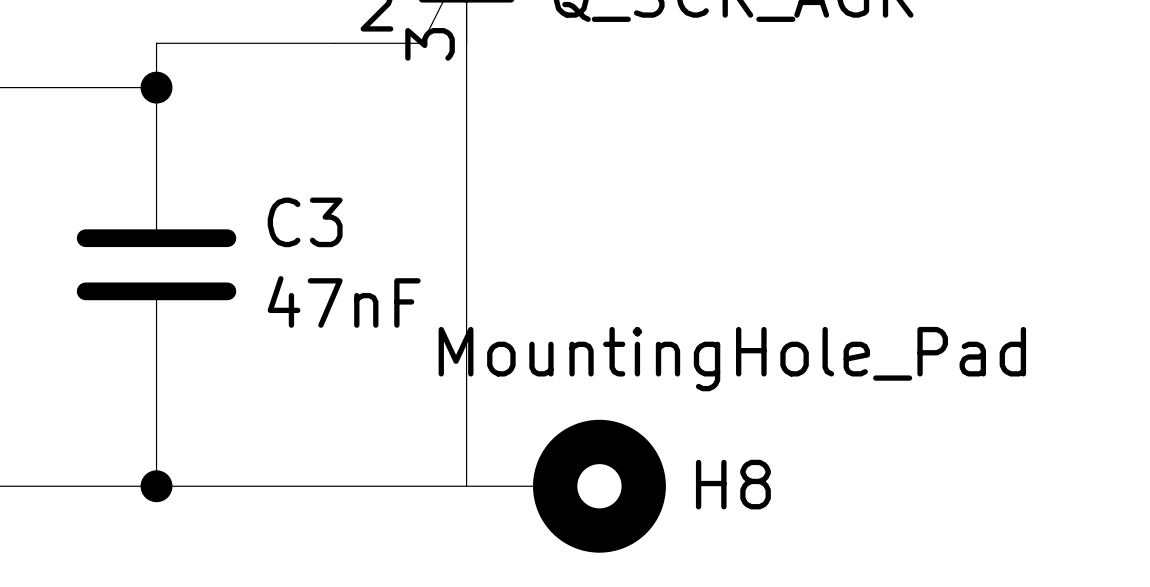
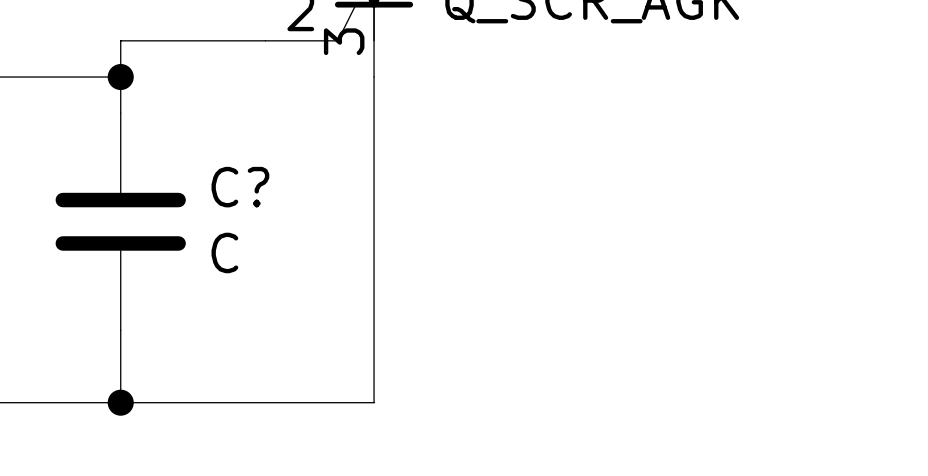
C3 name: C3 (305, 222) -> C? (240, 187)
C3 value: 47nF (344, 301) -> C (224, 252)
H8: MountingHole_Pad (566, 486) -> none

